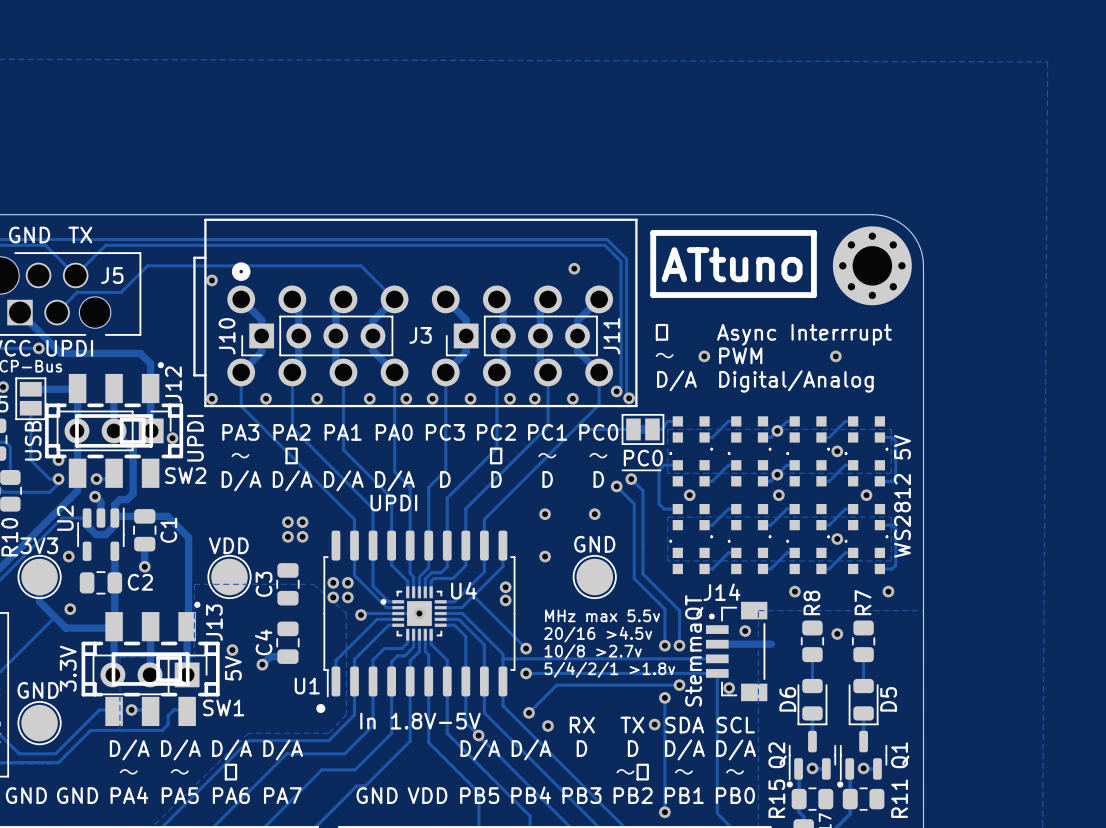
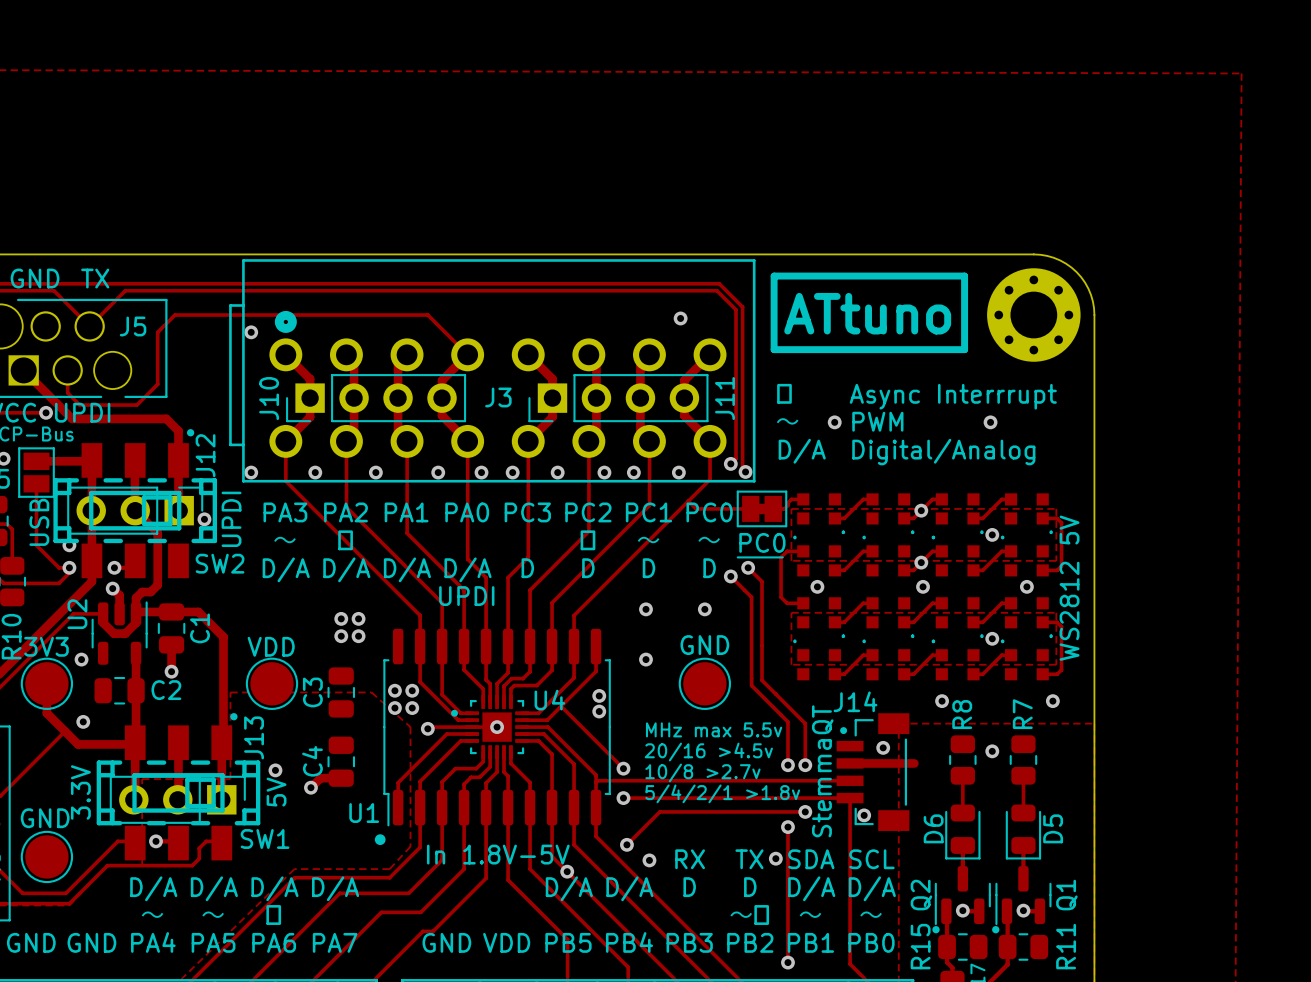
track: (133, 280) (121, 292) (77, 292) (57, 312) -> (157, 332) (157, 384) (136, 405) (79, 405) (67, 392) (67, 370)

